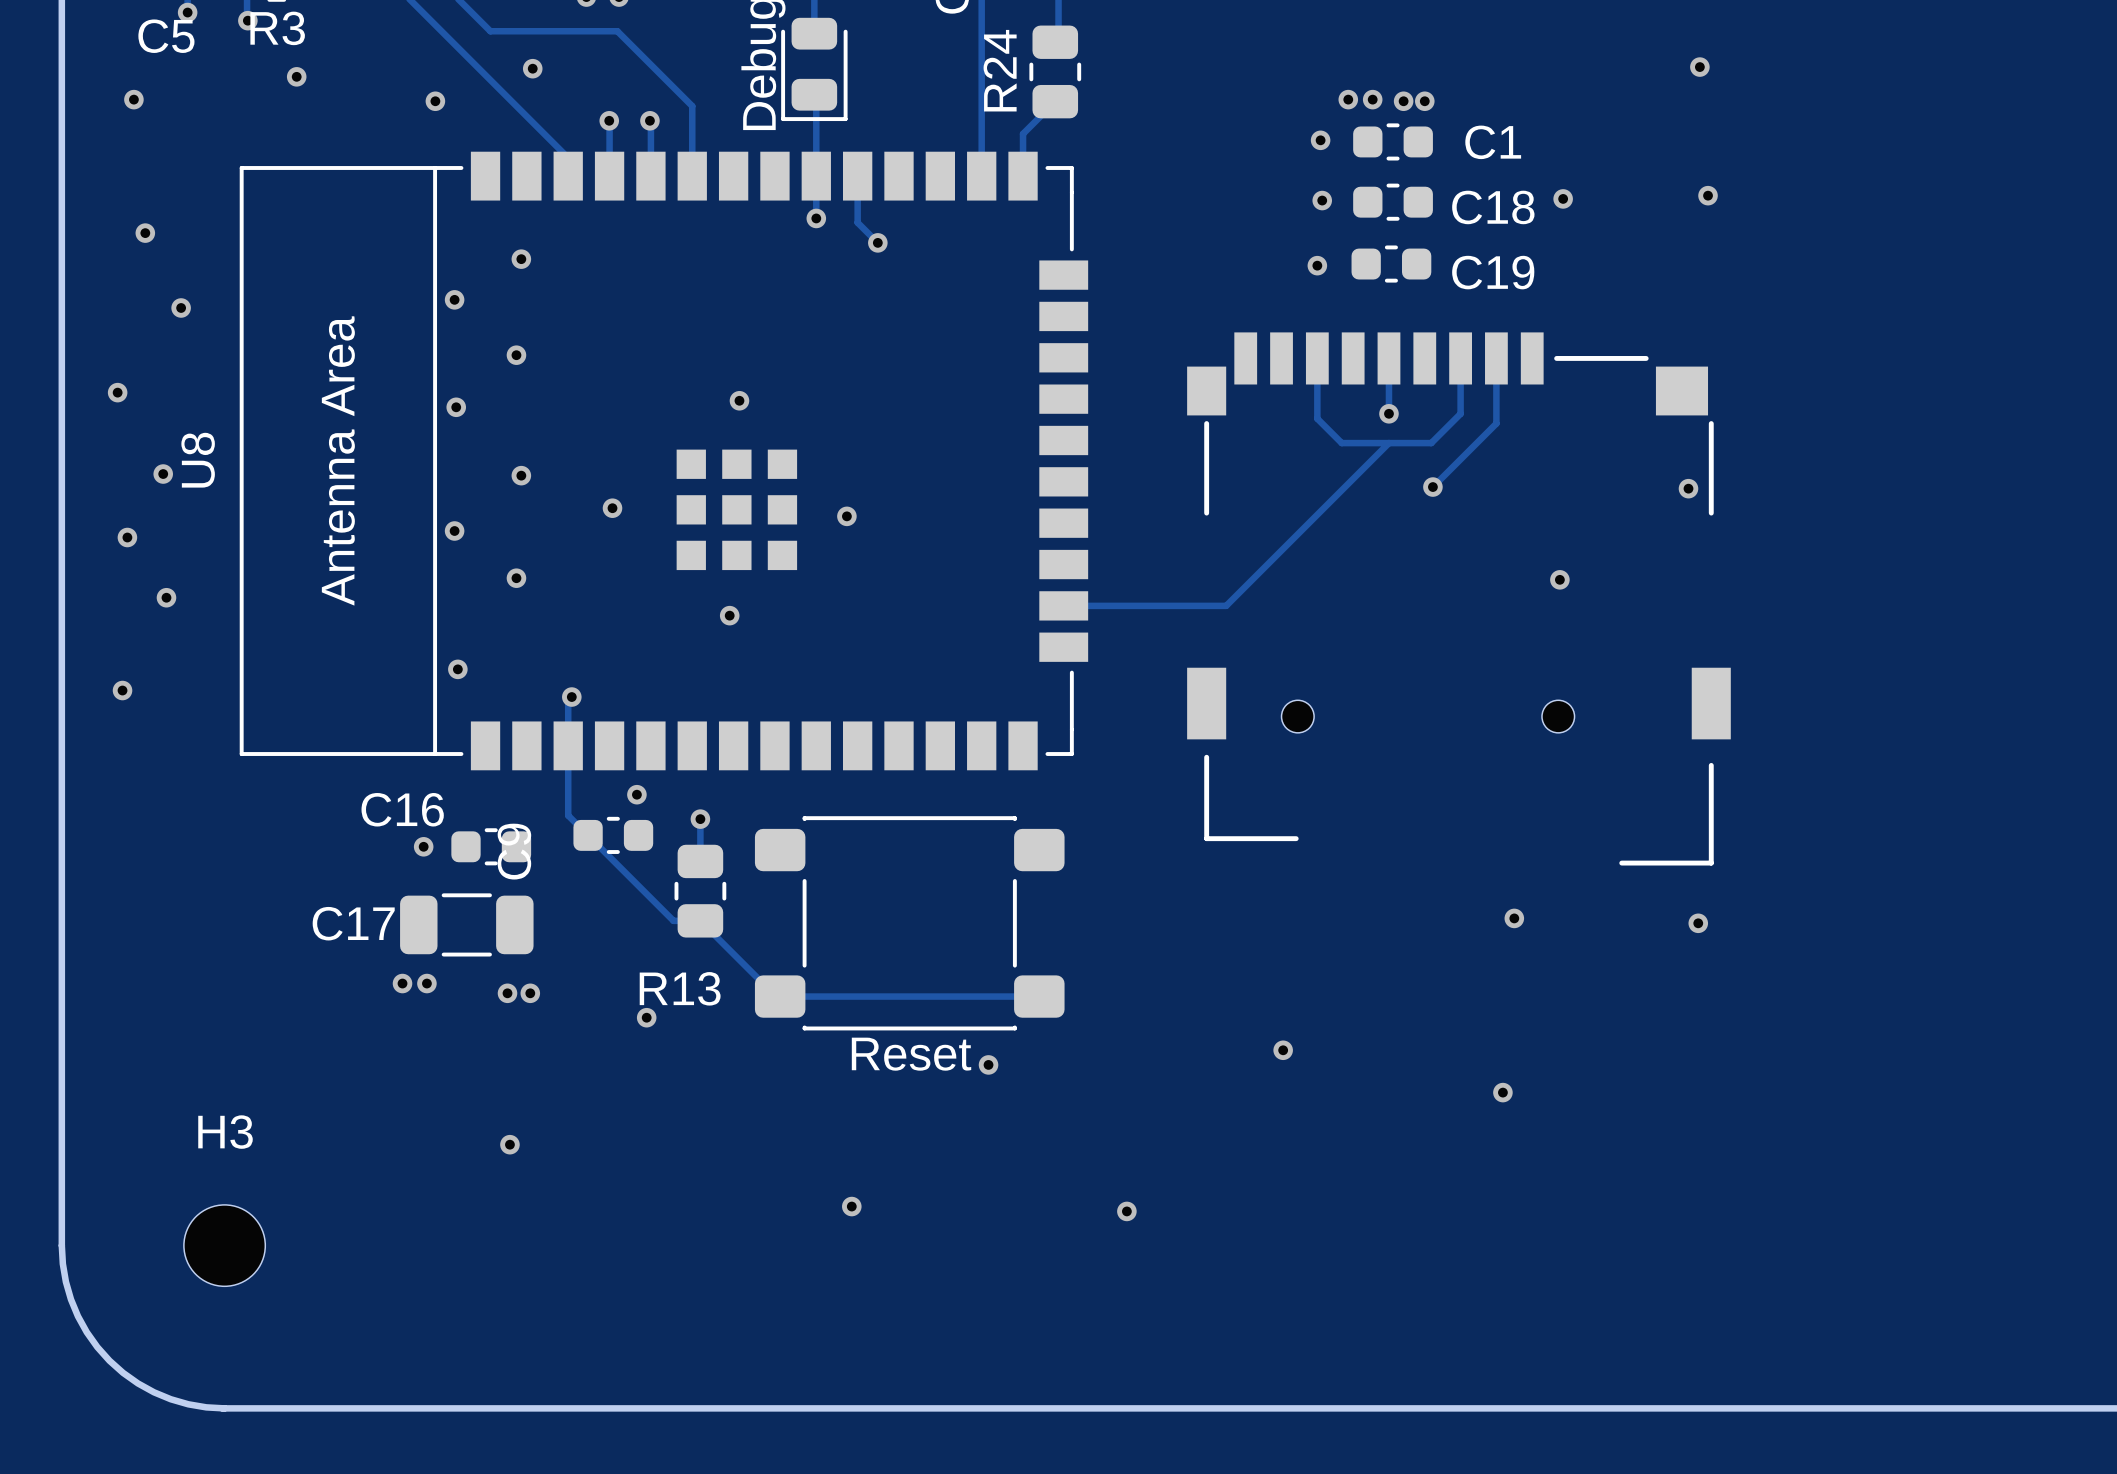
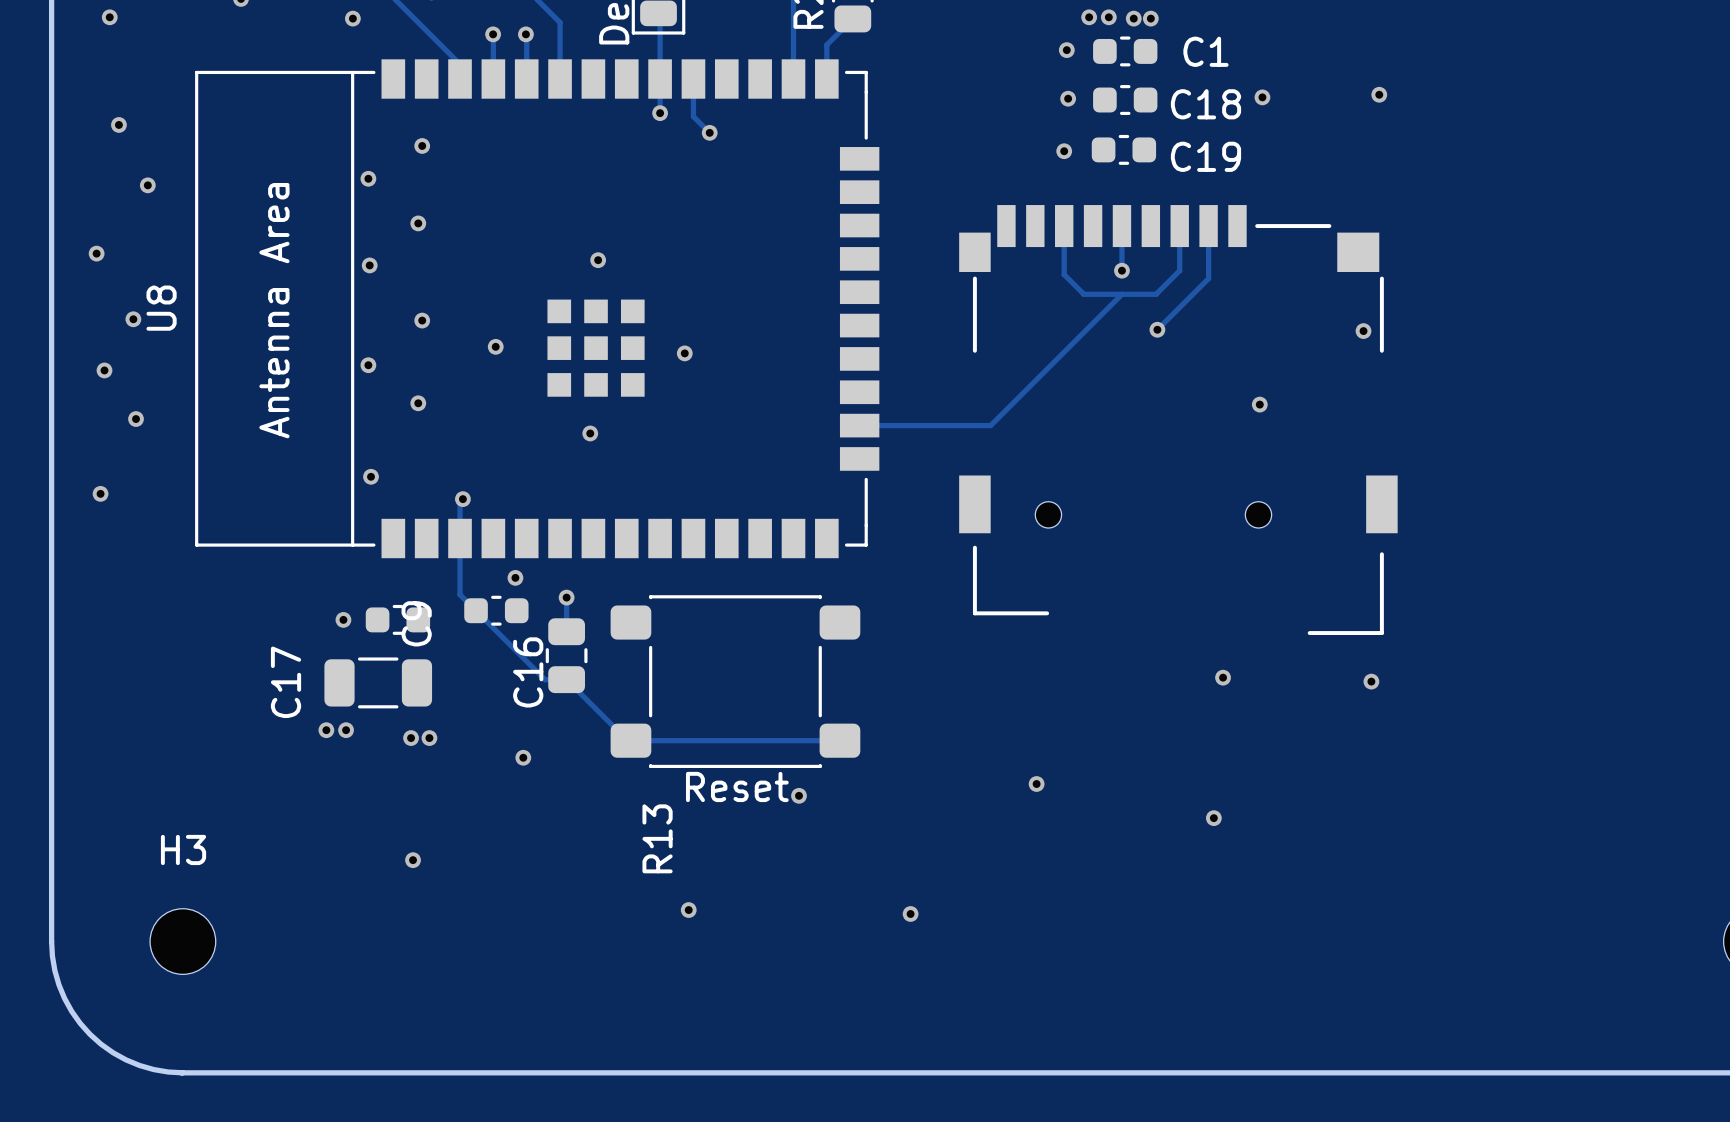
C16 name rotation: 0° (402, 809) -> 90° counterclockwise (528, 672)
C16 name position: C16 (402, 809) -> C16 (528, 672)
C17 name rotation: 0° (353, 923) -> 90° counterclockwise (286, 682)
R13 name rotation: 0° (680, 988) -> 90° counterclockwise (657, 838)
R13 name position: R13 (680, 988) -> R13 (657, 838)

